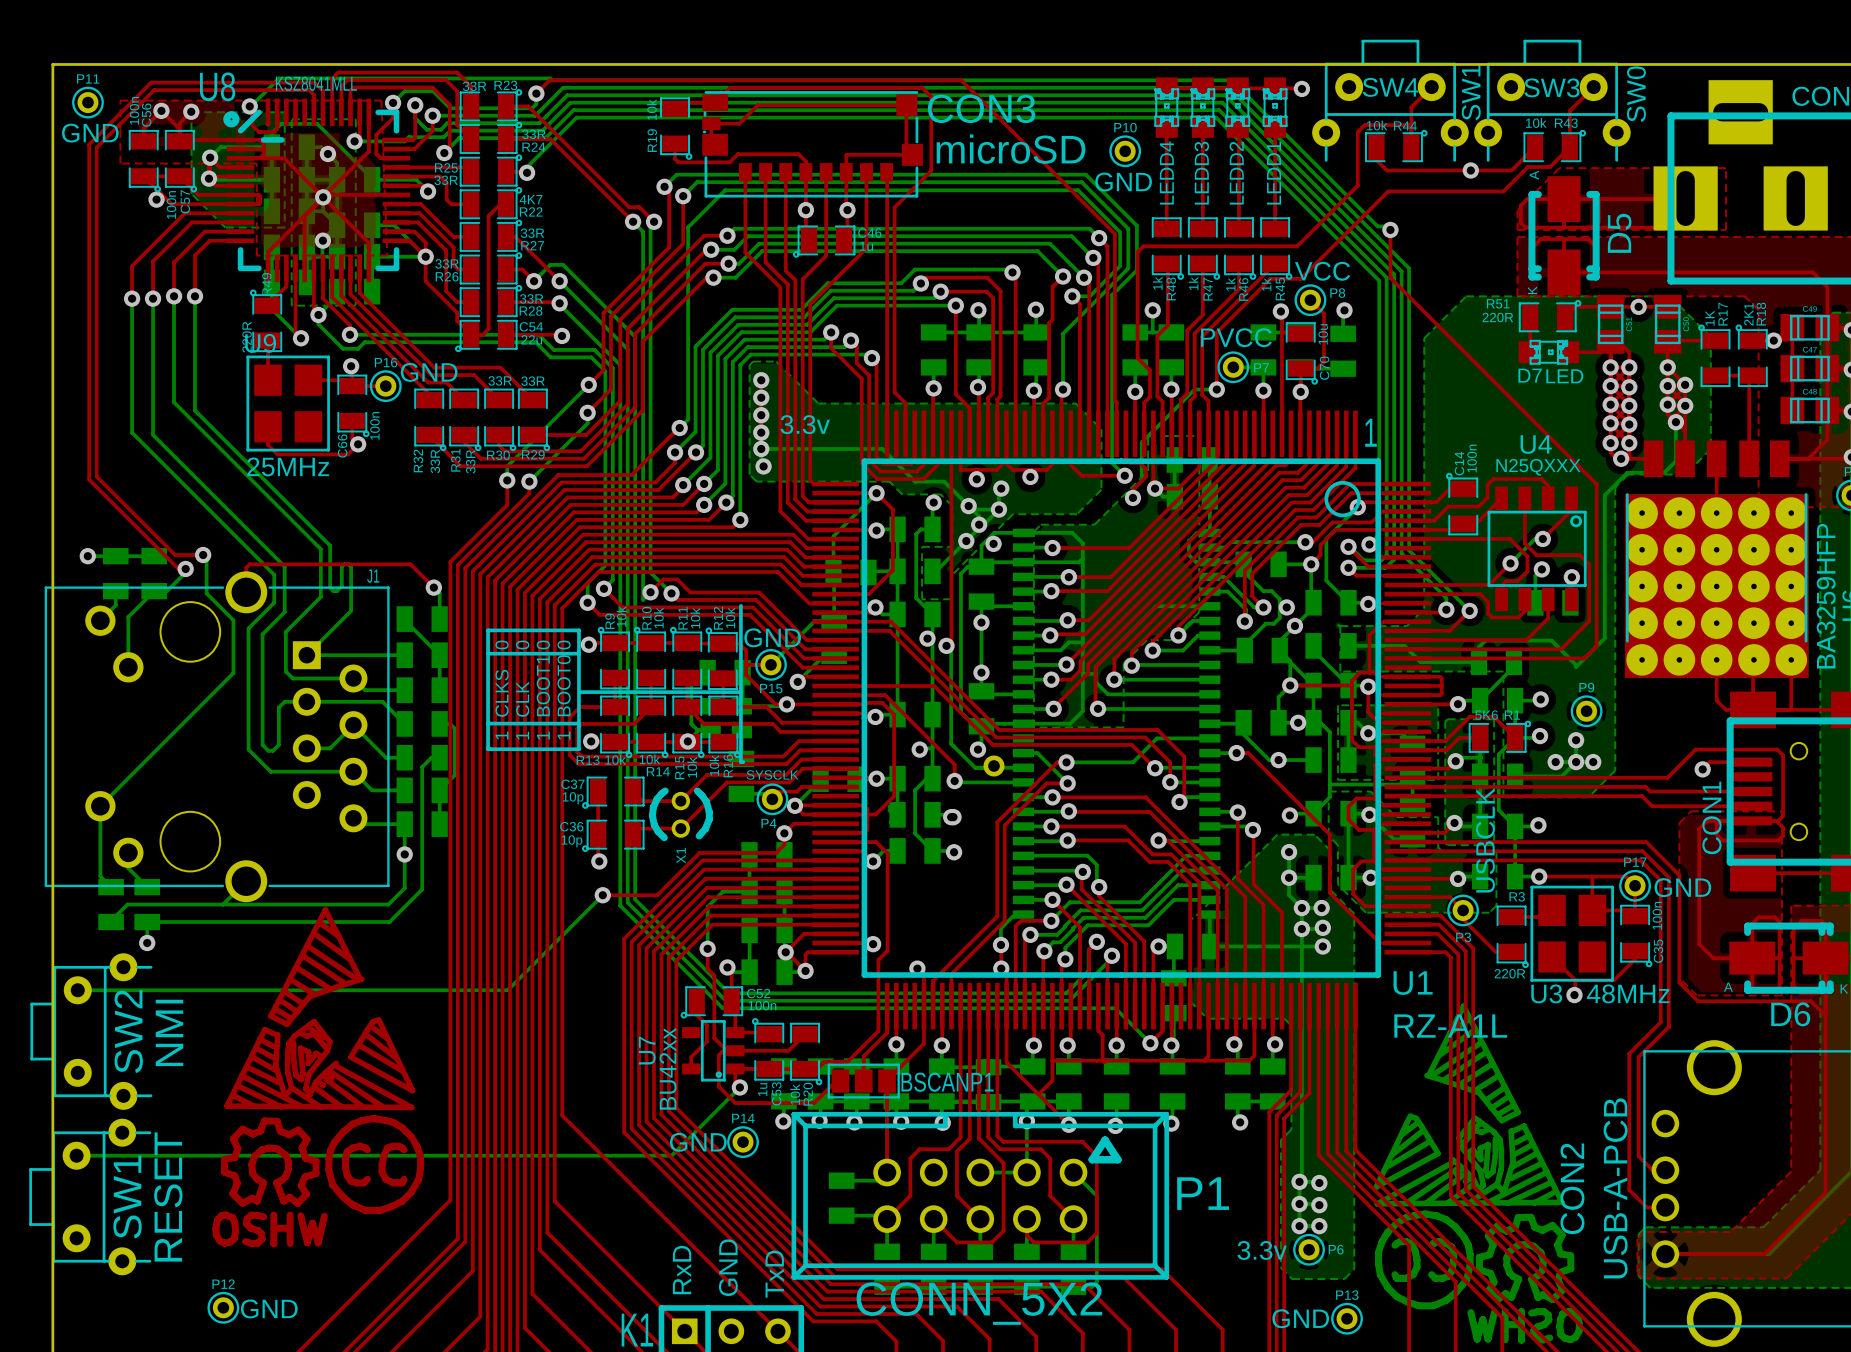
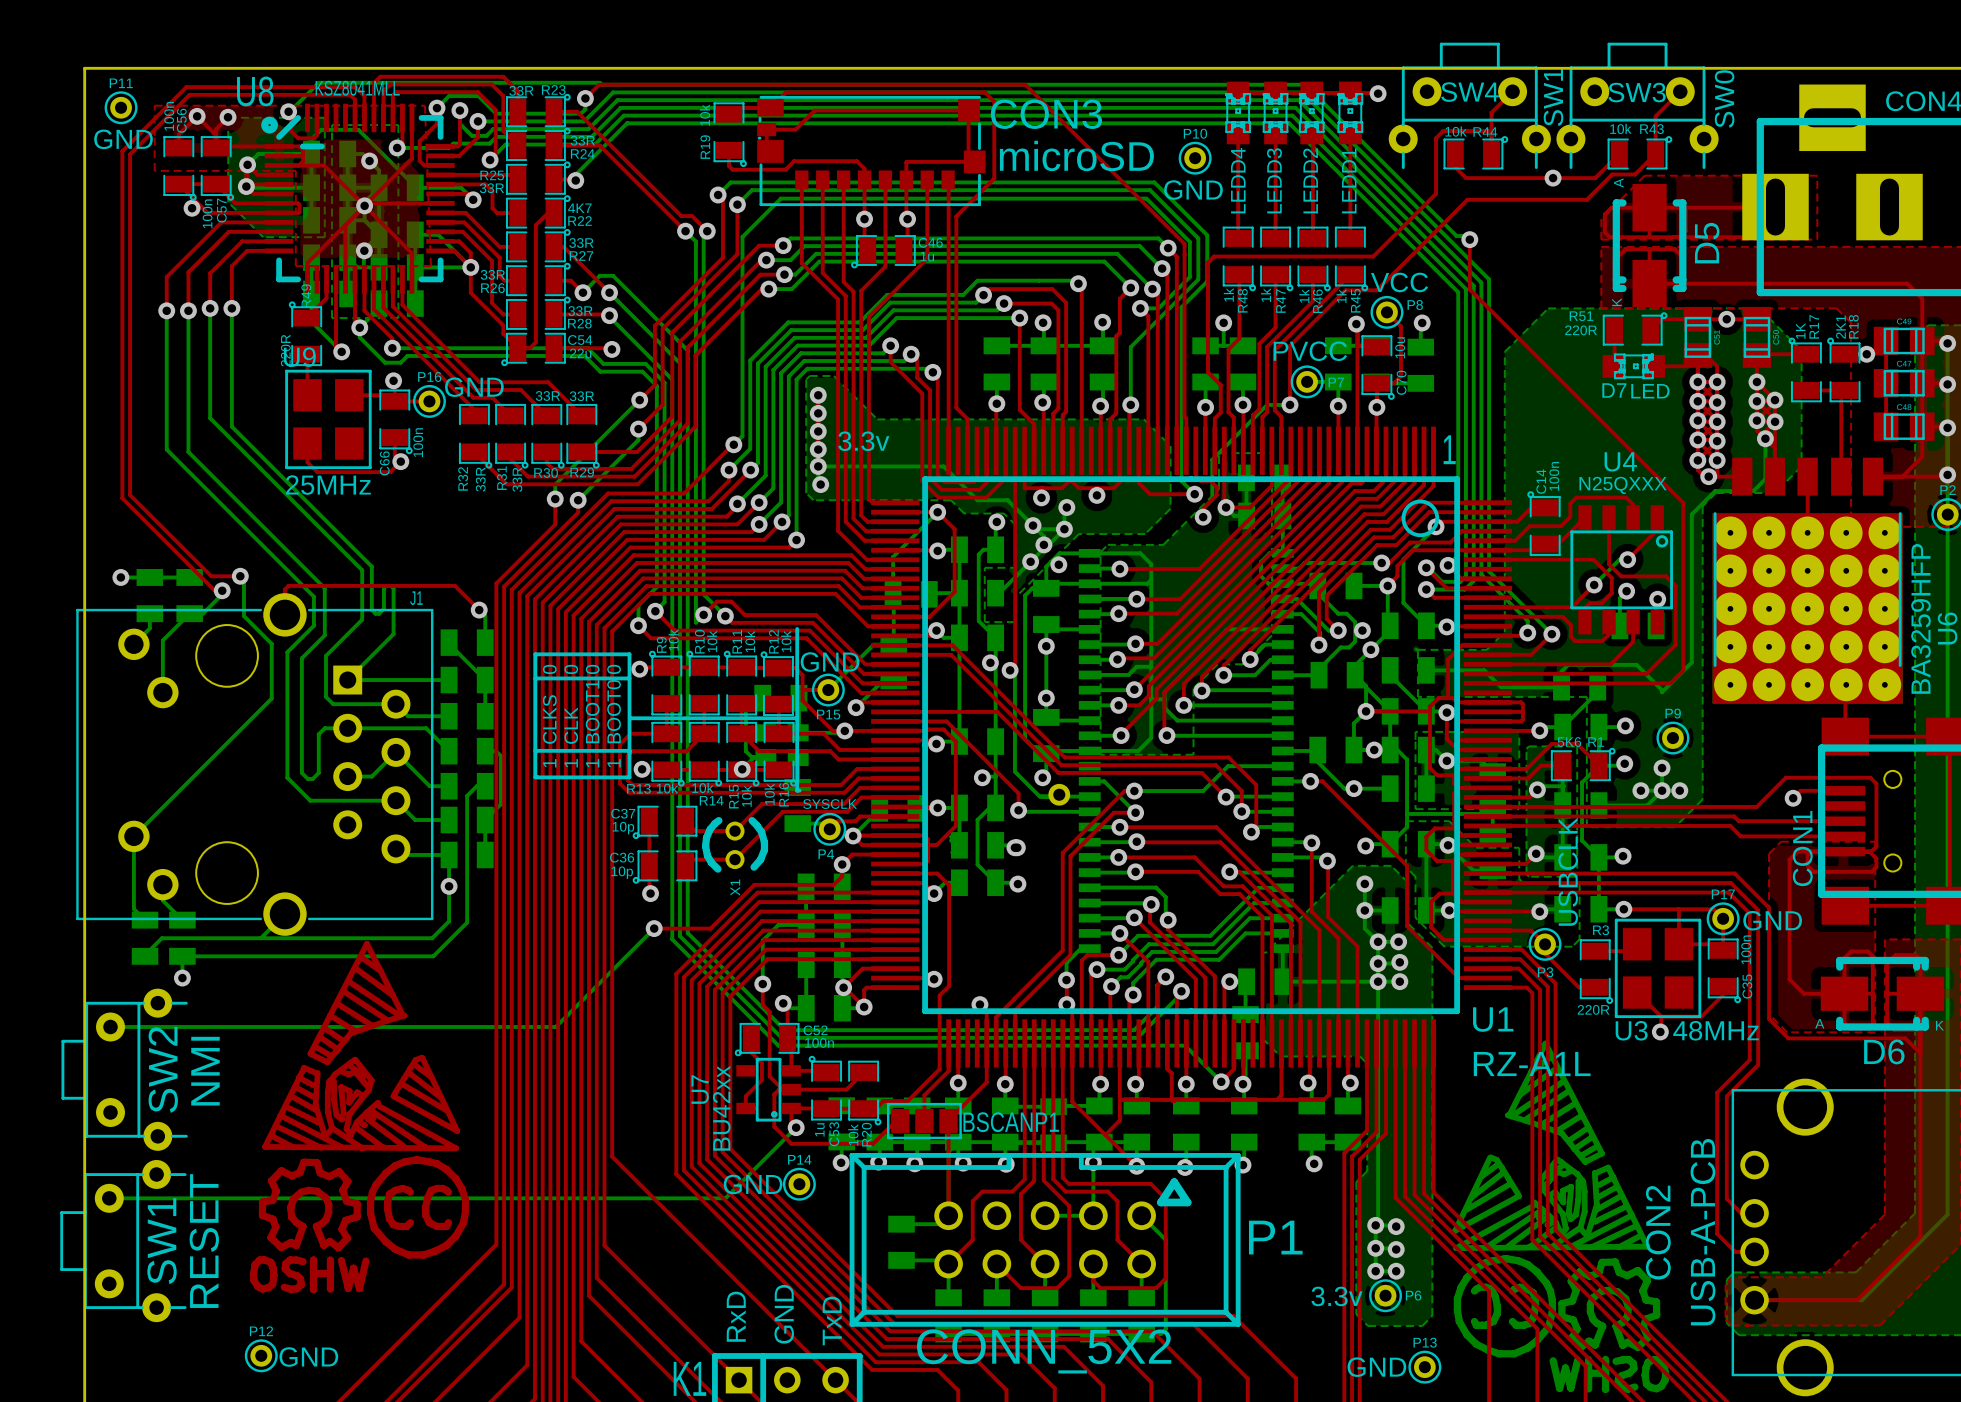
top track: (1716, 659) (1716, 700) (1726, 709) (1753, 709) -> none
top track: (1791, 659) (1789, 709) -> none
via: none -> (1378, 981)

